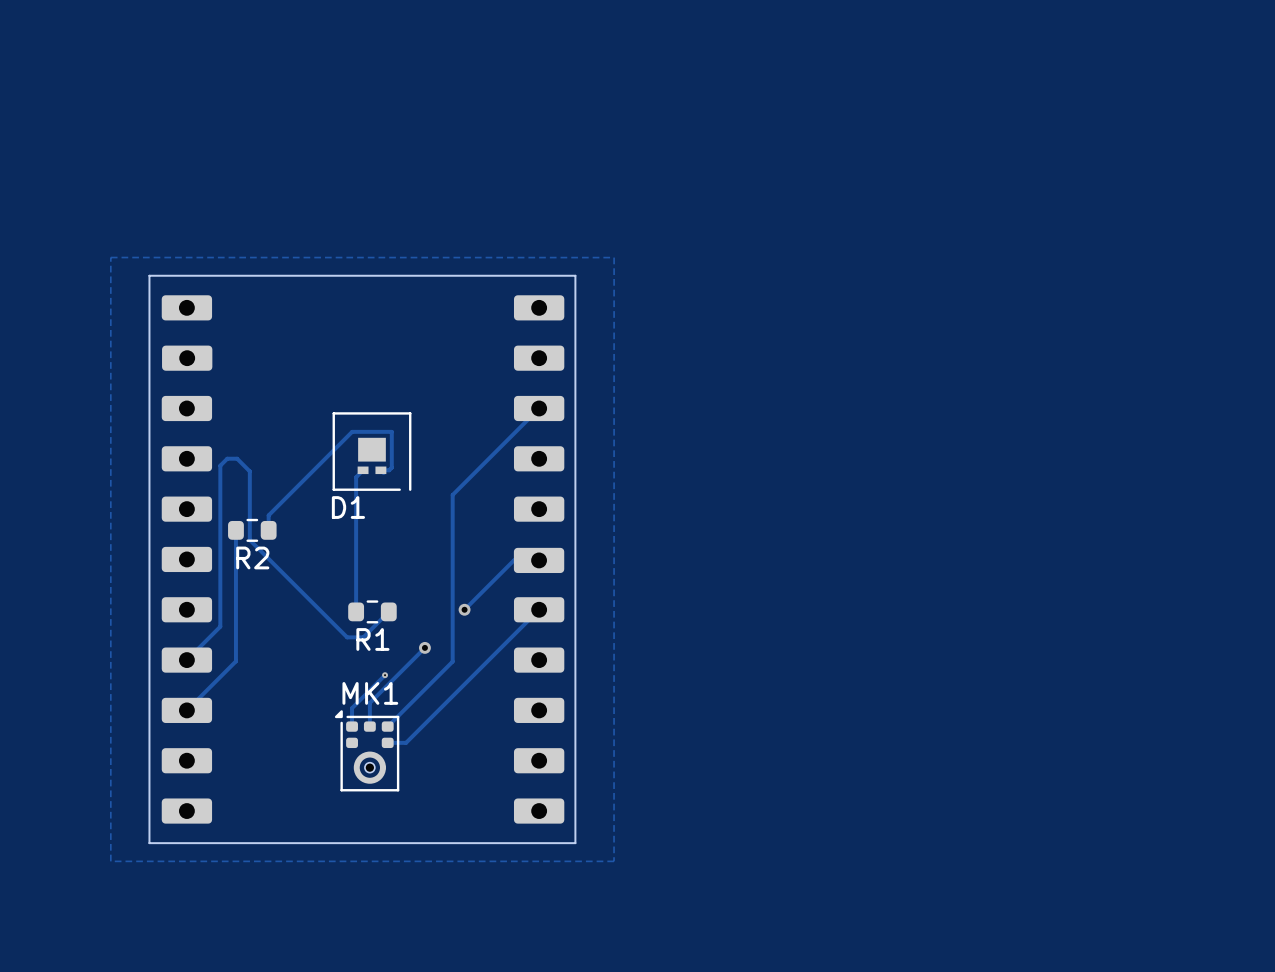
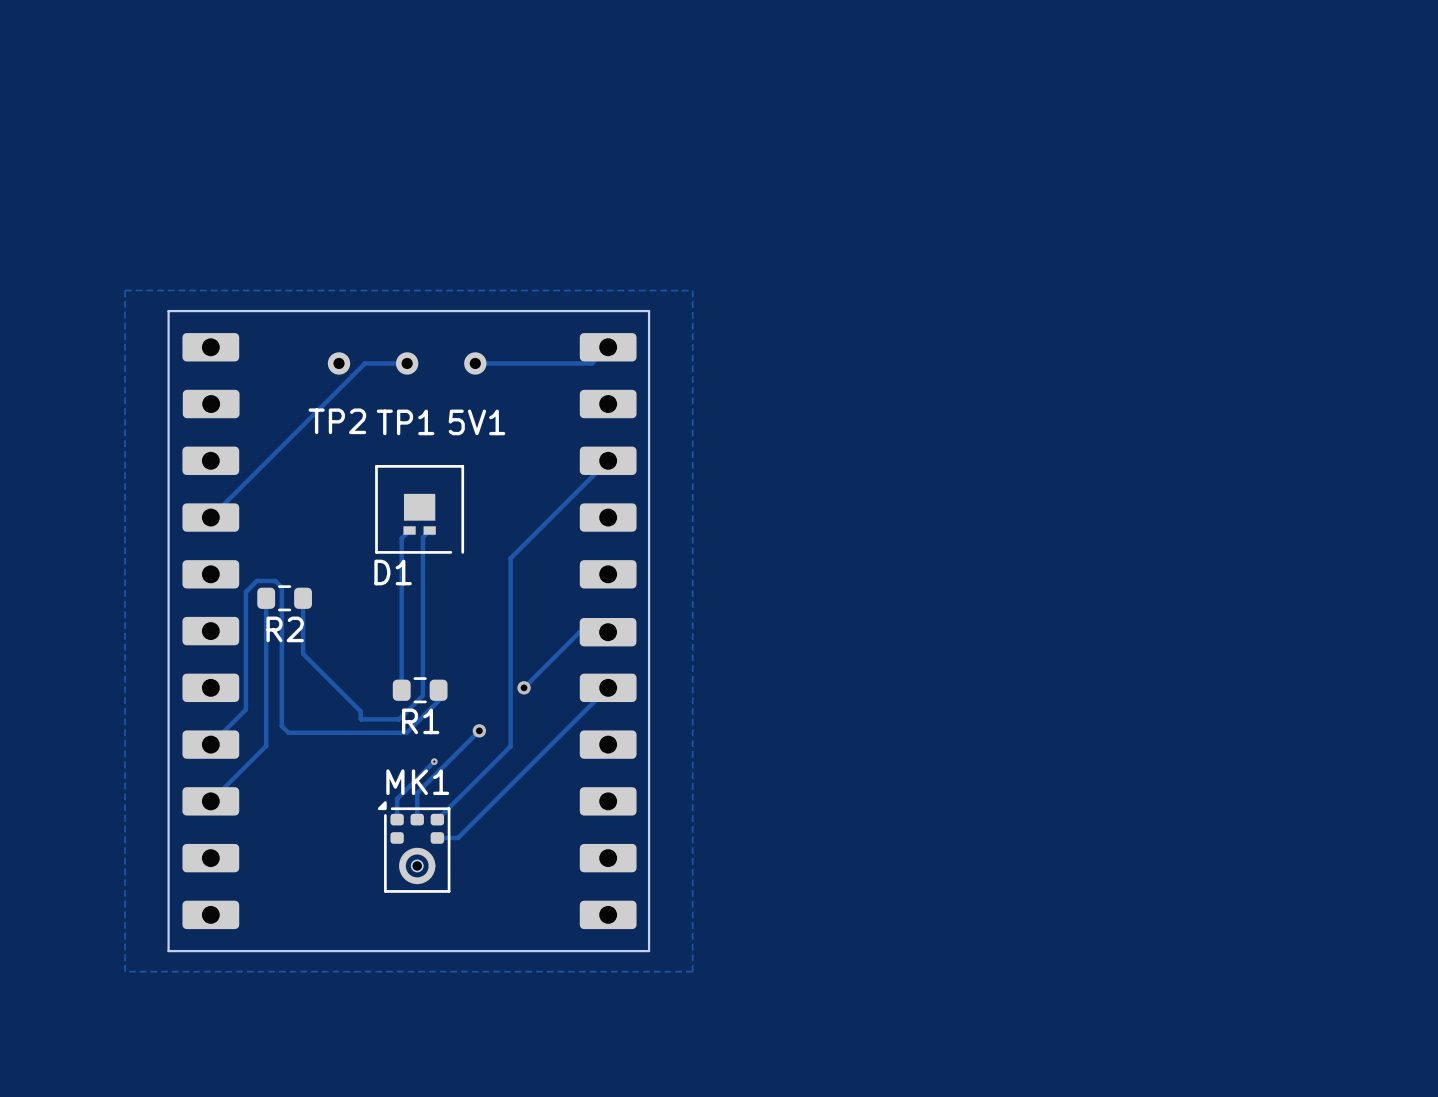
track: none -> (608, 347) (591, 363) (475, 363)
TP2: none -> (339, 363)
track: none -> (407, 363) (364, 363) (210, 517)
TP1: none -> (407, 363)
5V1: none -> (475, 363)
track: (380, 470) (389, 470) (391, 467) (391, 431) (352, 431) (268, 515) (268, 530) -> (429, 530) (422, 537) (422, 695) (399, 719) (360, 719) (360, 711) (303, 653) (303, 598)
track: (249, 520) (249, 471) (237, 458) (227, 458) (220, 465) (220, 626) (218, 628) -> (281, 587) (275, 580) (256, 580) (245, 592) (245, 709)
track: (249, 540) (347, 637) (363, 637) (388, 611) -> (281, 609) (281, 726) (288, 732) (406, 732) (438, 700) (438, 690)

